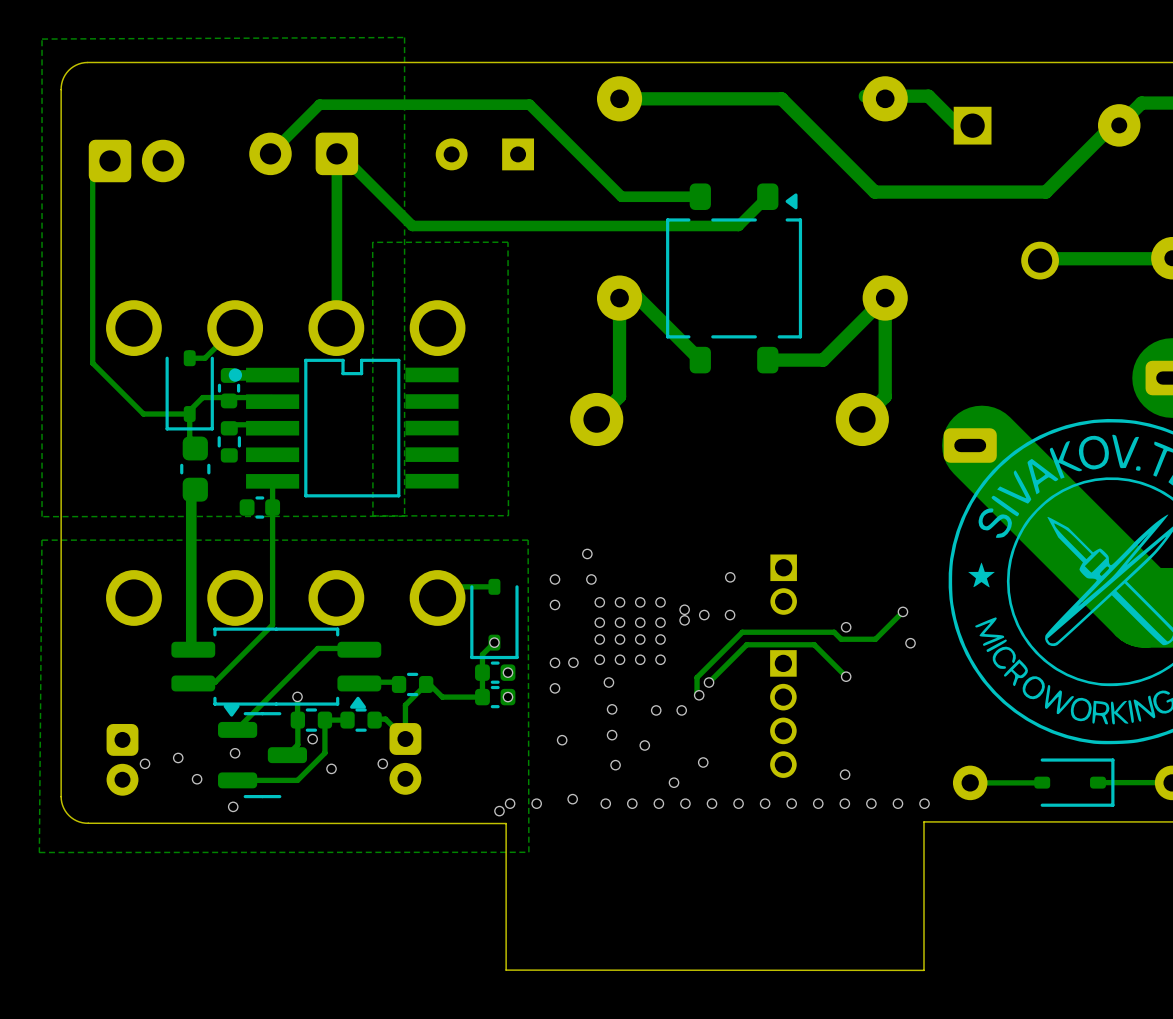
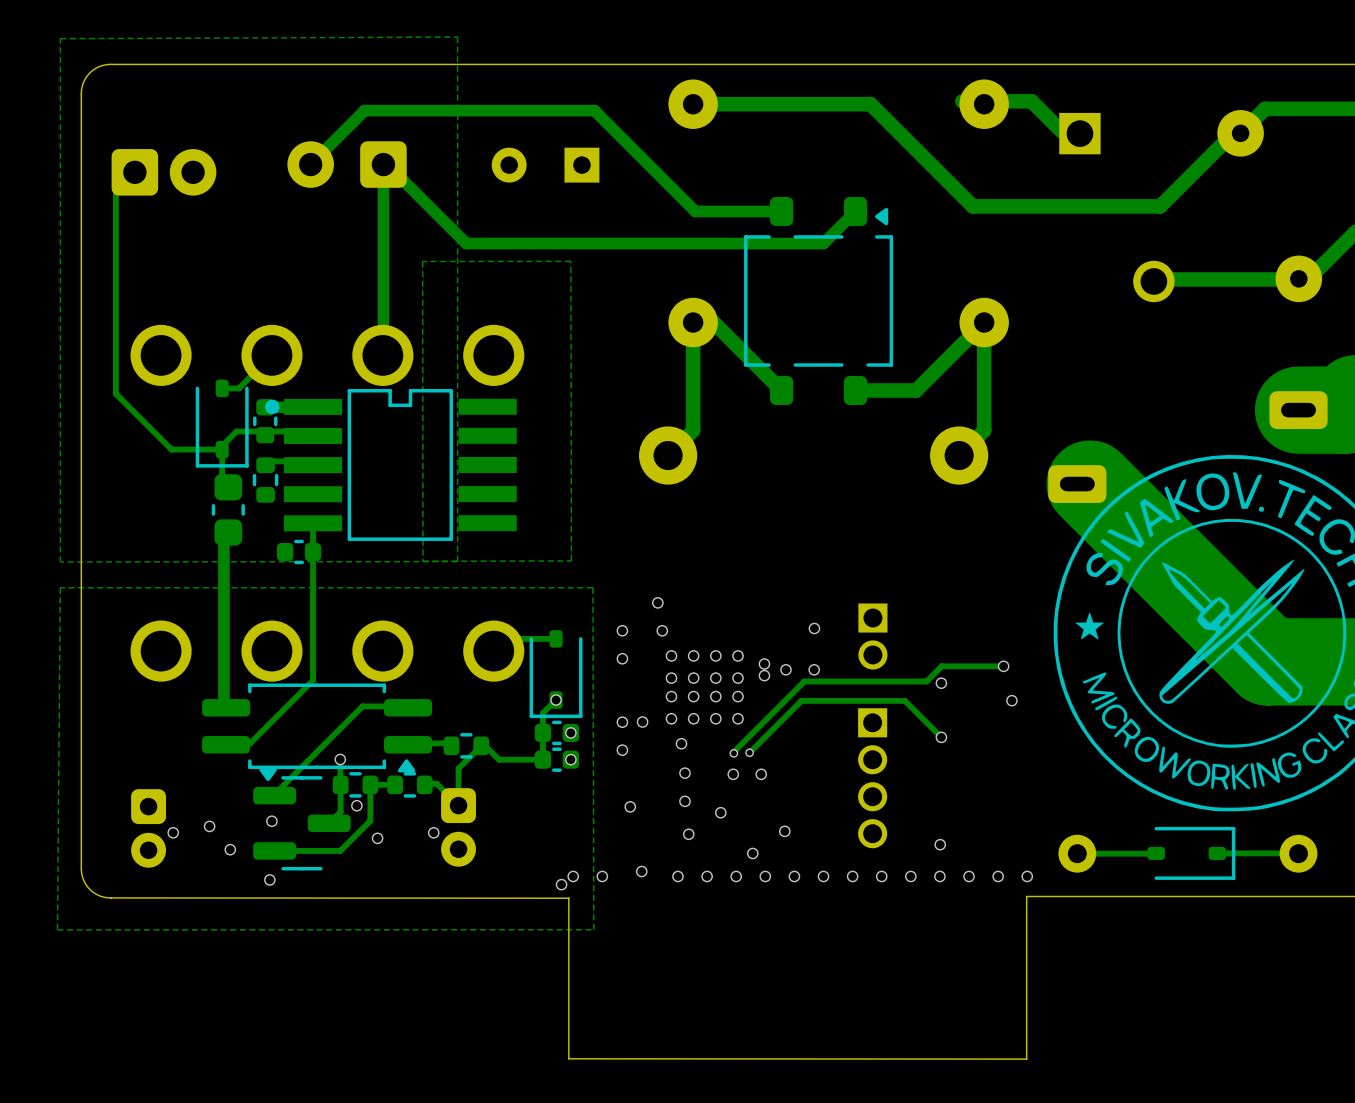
track: (902, 611) (875, 639) (841, 639) (834, 632) (742, 632) (697, 677) (697, 693) (699, 695) -> (1003, 666) (941, 666) (926, 681) (804, 681) (733, 753)
track: (814, 644) (746, 644) (709, 682) -> (906, 702) (801, 700) (749, 752)
via: (709, 682) -> none
via: none -> (749, 752)
via: none -> (733, 753)
via: (699, 695) -> none

